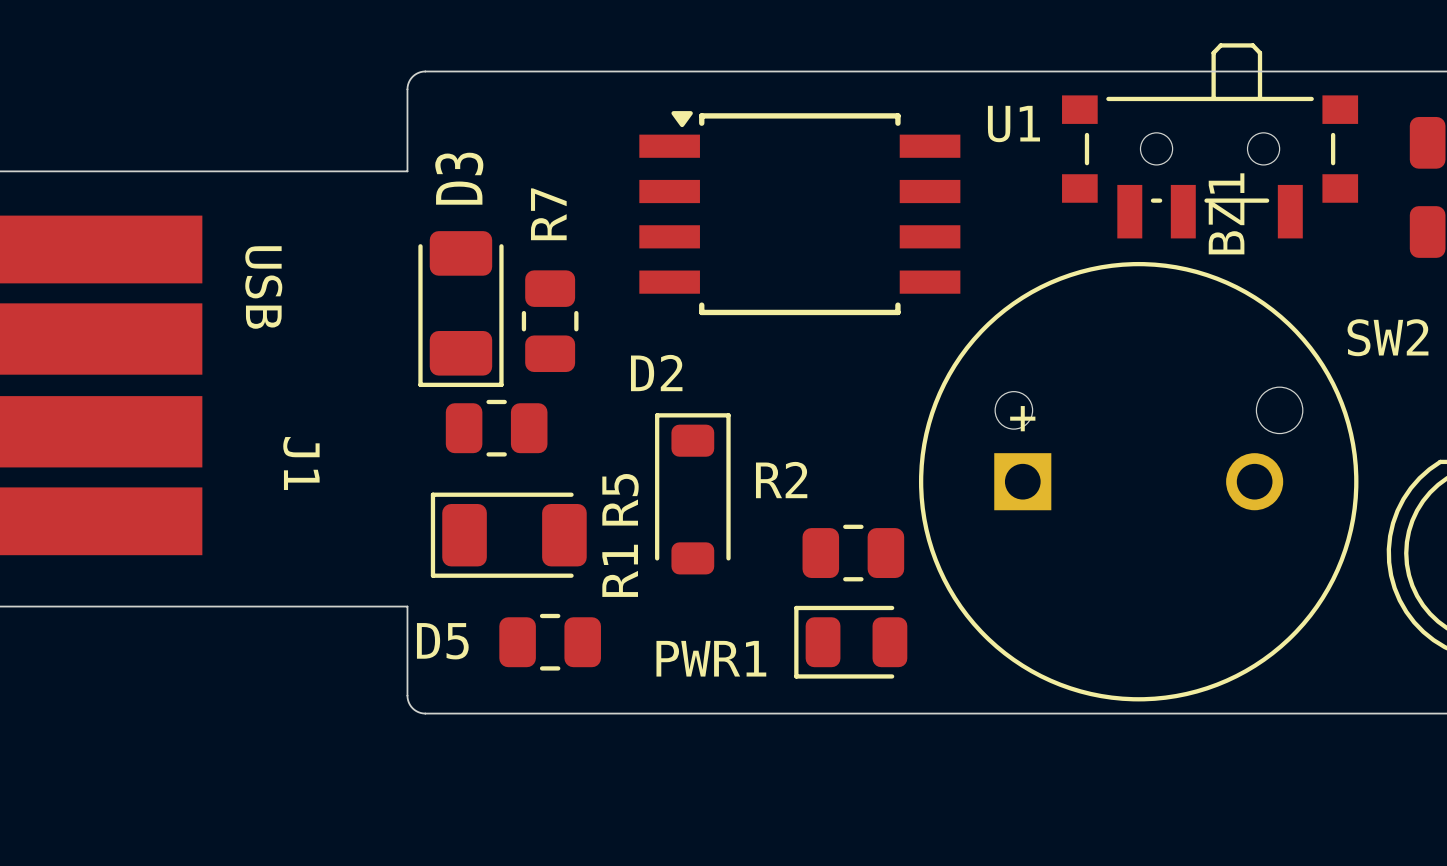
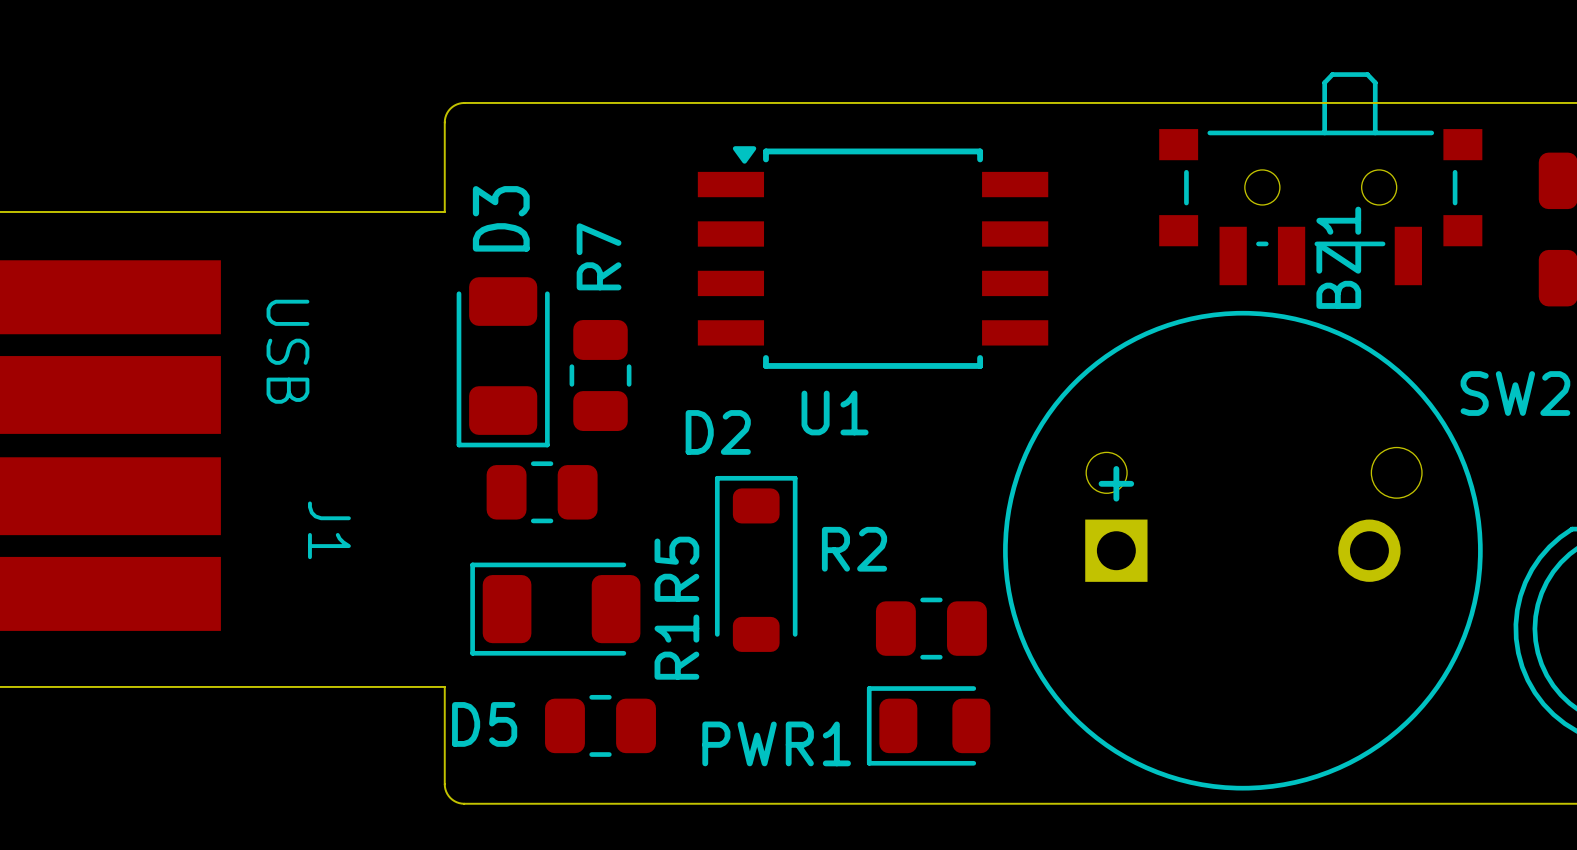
U1 name position: U1 (1013, 124) -> U1 (835, 412)

